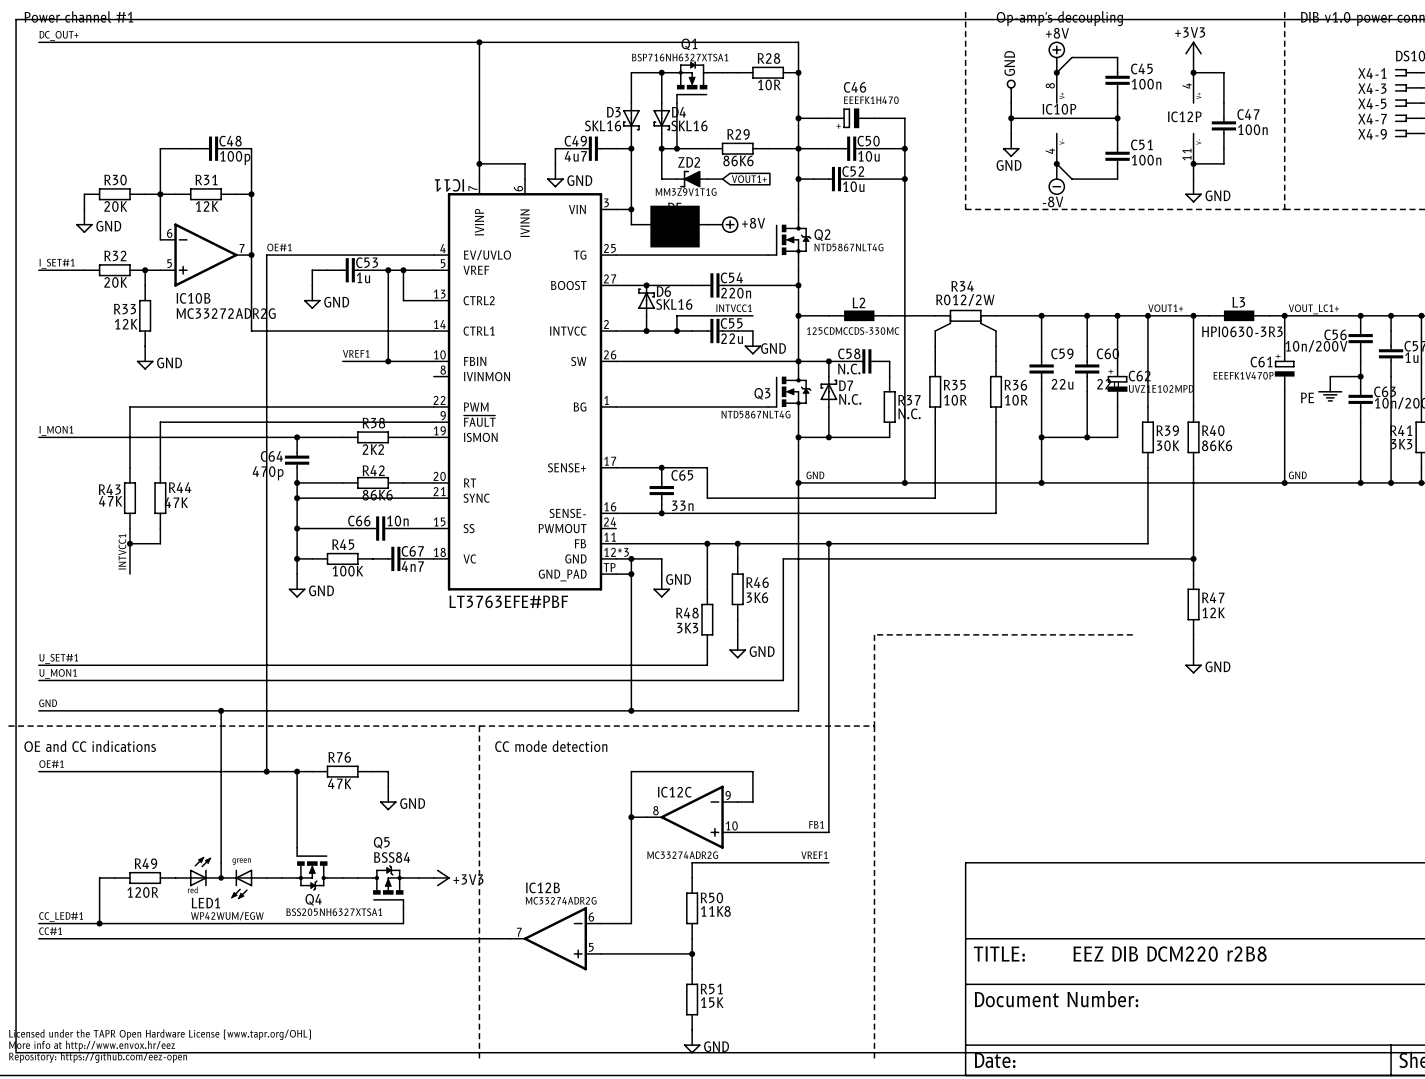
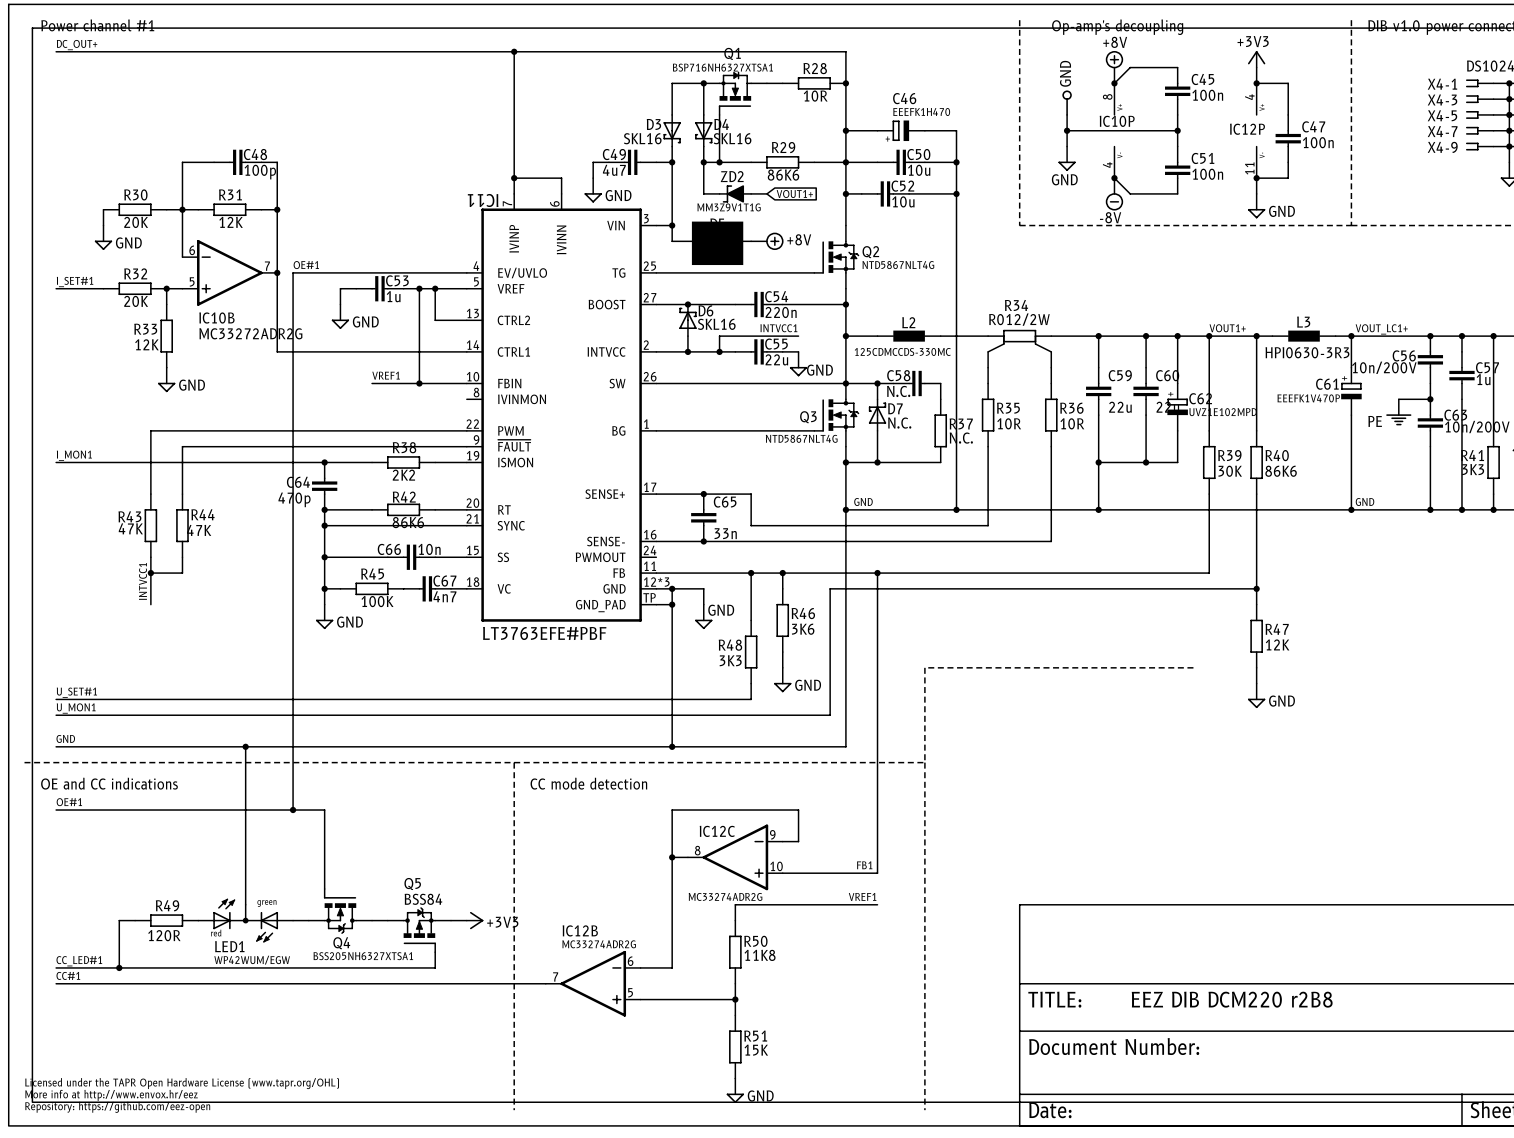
wire: (297, 771) (312, 771) -> none
junction: (297, 771) -> none
R76: 47K (342, 771) -> none
wire: (373, 771) (388, 771) (388, 786) -> none
power symbol: GND (388, 798) -> none

